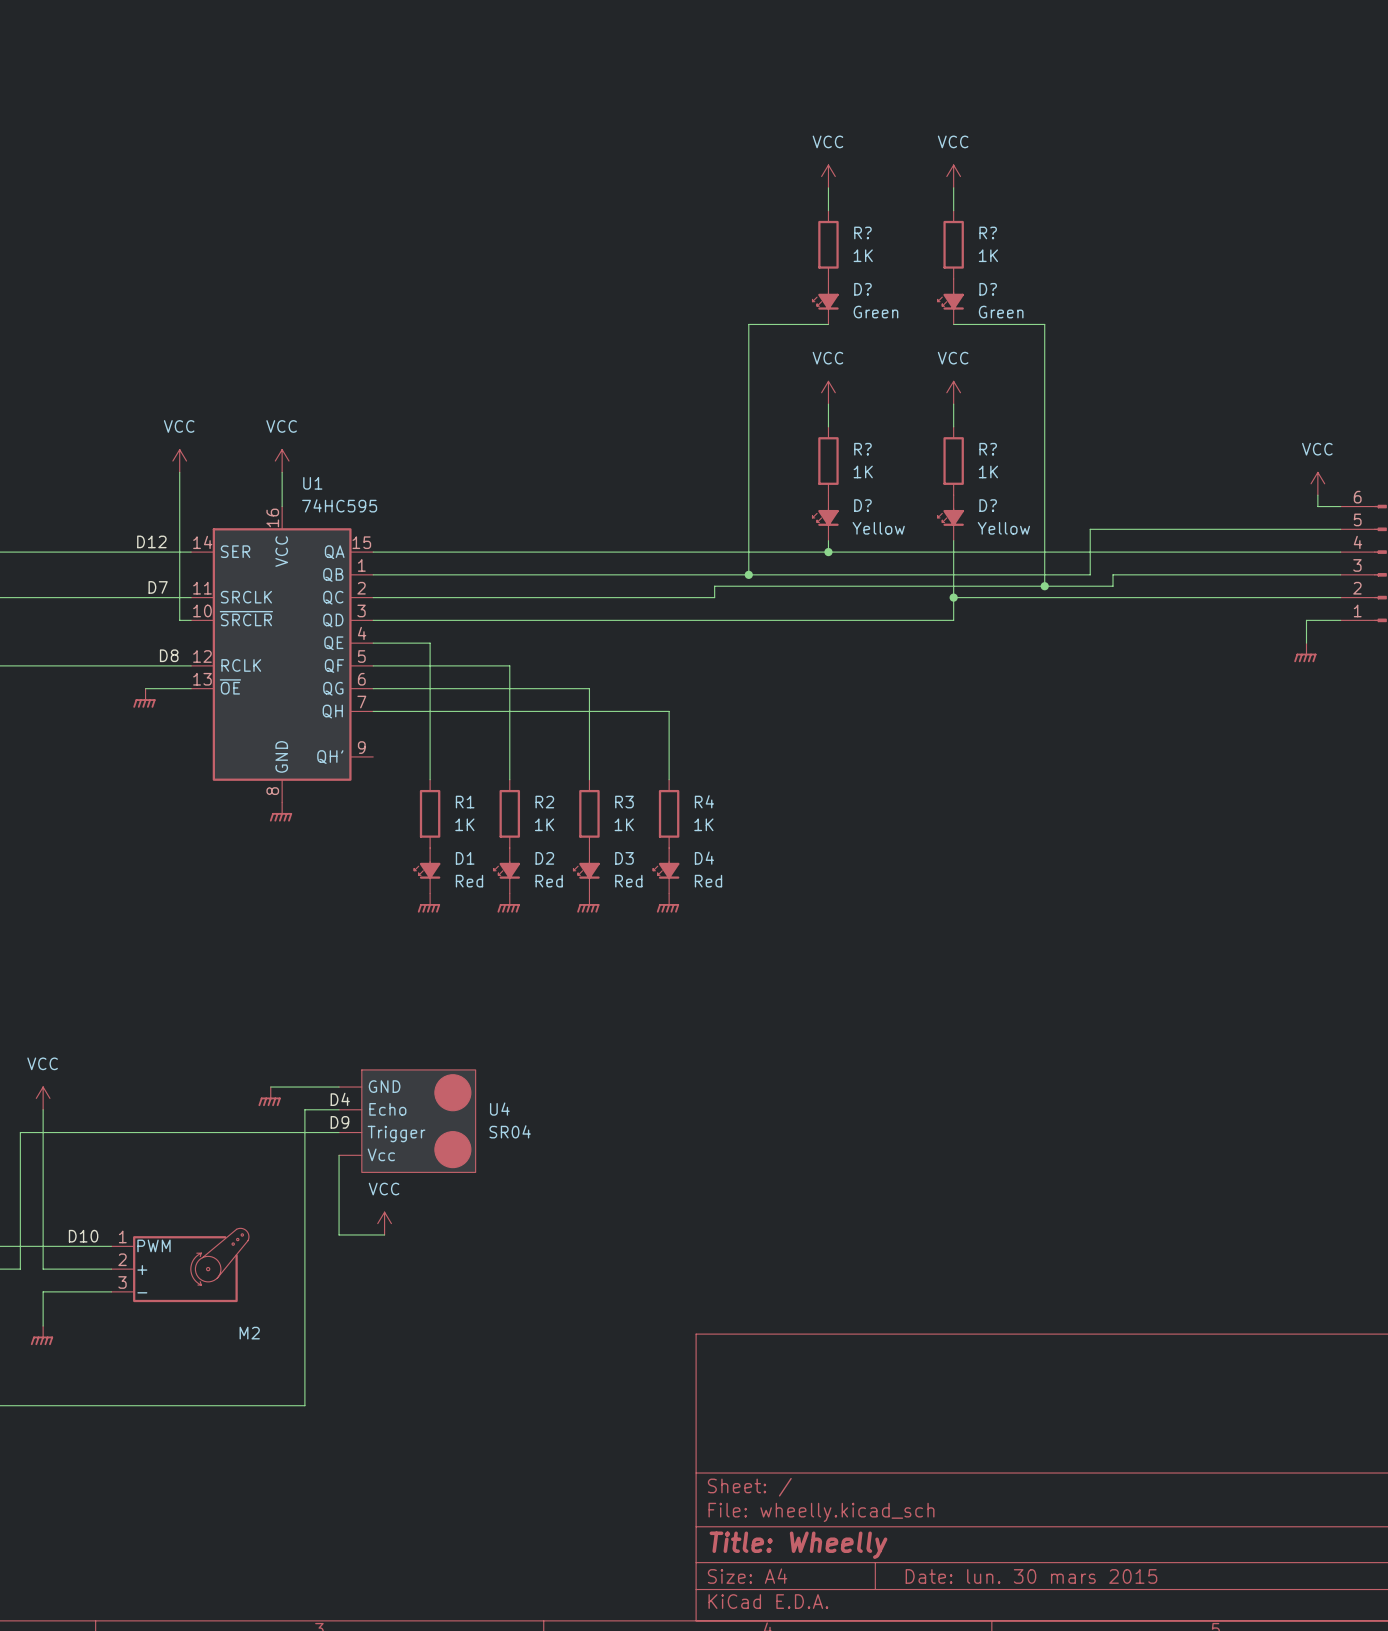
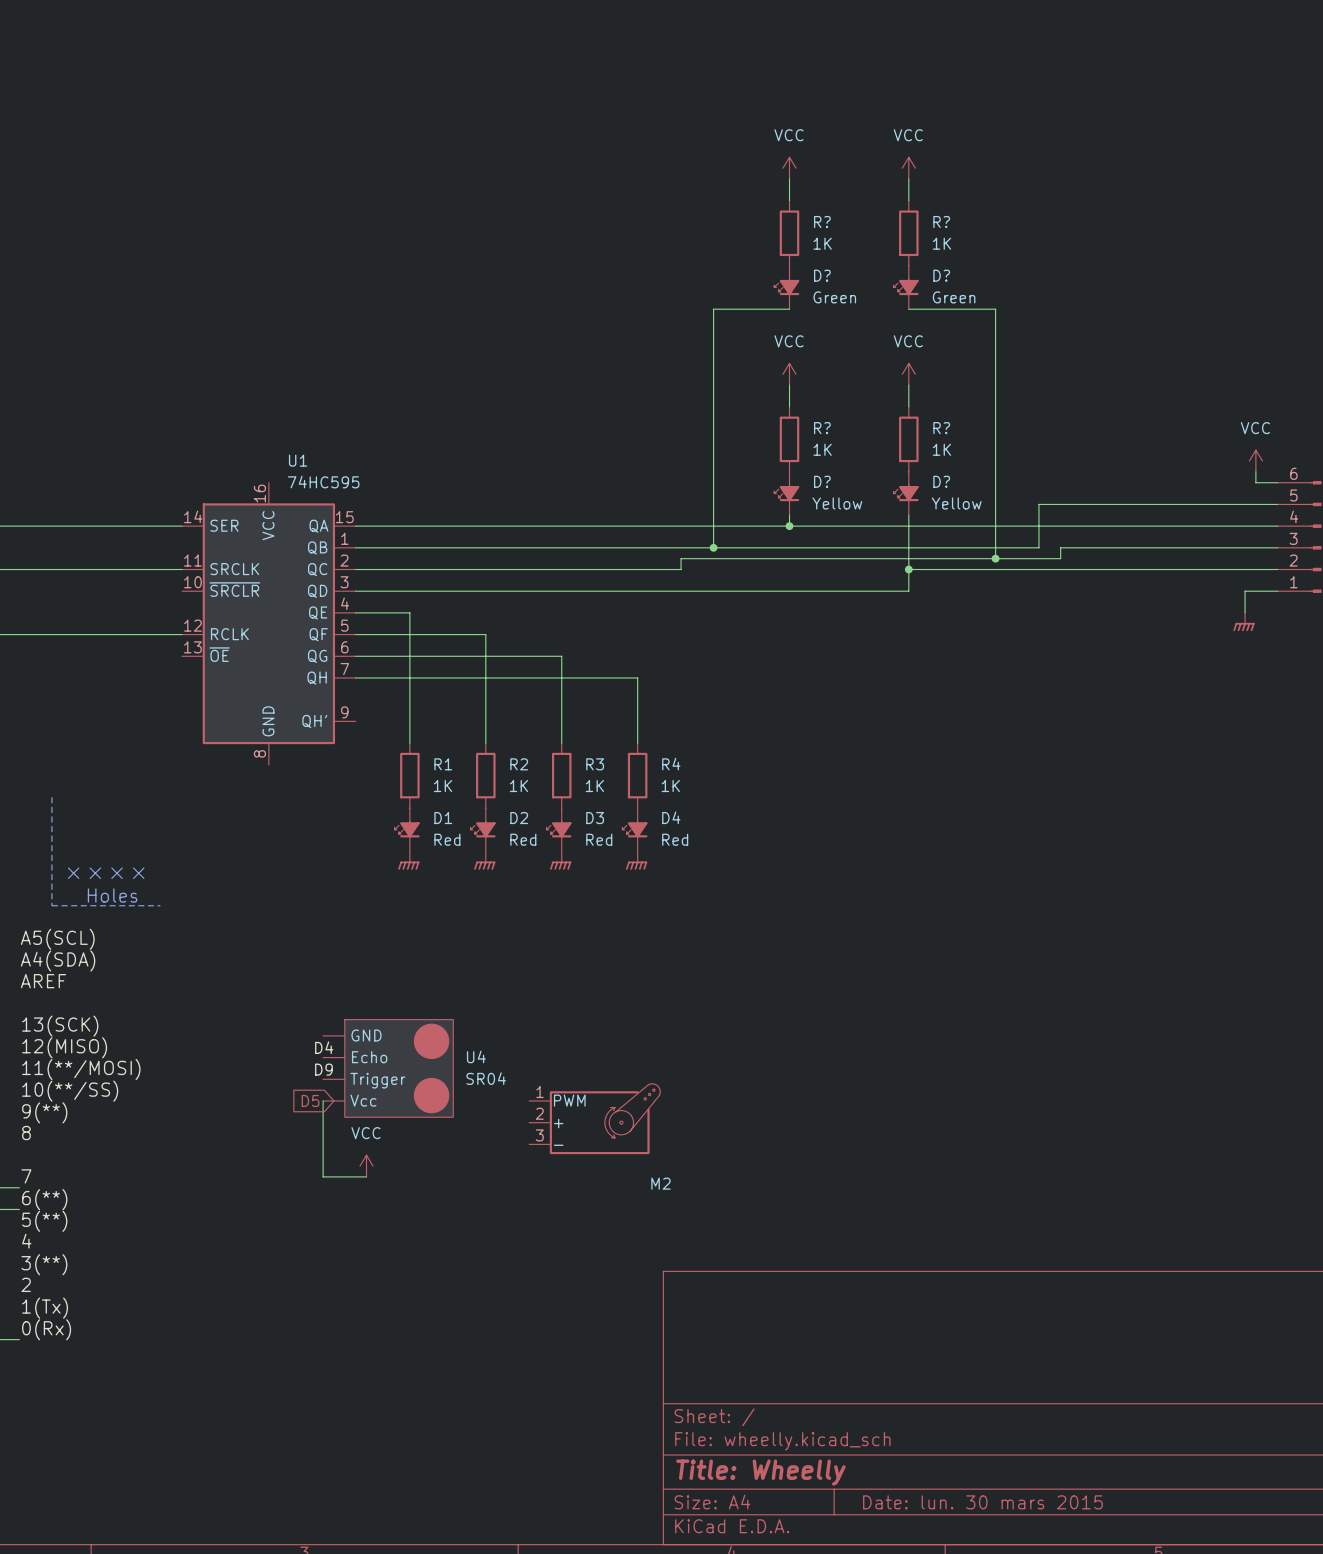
power symbol: VCC (179, 461) -> none
power symbol: VCC (282, 461) -> none
wire: (179, 472) (179, 620) (191, 620) -> none
wire: (282, 472) (282, 506) -> none
label: D12 (151, 541) -> none
label: D7 (158, 587) -> none
label: D8 (169, 655) -> none
wire: (145, 688) (191, 688) -> none
power symbol: (144, 698) -> none
power symbol: (281, 812) -> none
line: none -> (51, 797) (51, 905) (160, 905)
no-connect mark: none -> (73, 873)
no-connect mark: none -> (95, 873)
no-connect mark: none -> (117, 873)
no-connect mark: none -> (138, 873)
text: none -> Holes (112, 895)
label: none -> A5(SCL) (57, 939)
label: none -> A4(SDA) (58, 961)
label: none -> AREF (43, 981)
label: none -> 13(SCK) (60, 1026)
wire: (270, 1087) (339, 1087) -> none
power symbol: (269, 1096) -> none
power symbol: VCC (43, 1098) -> none
label: none -> 12(MISO) (64, 1047)
wire: (43, 1109) (43, 1269) (111, 1269) -> none
wire: (339, 1109) (304, 1109) (304, 1405) (20, 1405) -> none
label: none -> 11(**/MOSI) (81, 1069)
wire: (339, 1132) (20, 1132) (20, 1269) -> none
label: none -> 10(**/SS) (70, 1091)
global label: none -> D5 (310, 1100)
label: none -> 9(**) (44, 1112)
label: none -> 8 (26, 1133)
label: none -> 7 (26, 1176)
label: D10 (83, 1236) -> none
wire: (20, 1246) (111, 1246) -> none
label: none -> 6(**) (44, 1199)
M2 position: (180, 1265) -> (594, 1118)
label: none -> 5(**) (44, 1221)
wire: (111, 1291) (43, 1291) (43, 1326) -> none
label: none -> 4 (26, 1241)
label: none -> 3(**) (44, 1264)
power symbol: (41, 1335) -> none
label: none -> 2 (26, 1284)
label: none -> 1(Tx) (45, 1308)
label: none -> 0(Rx) (46, 1329)

